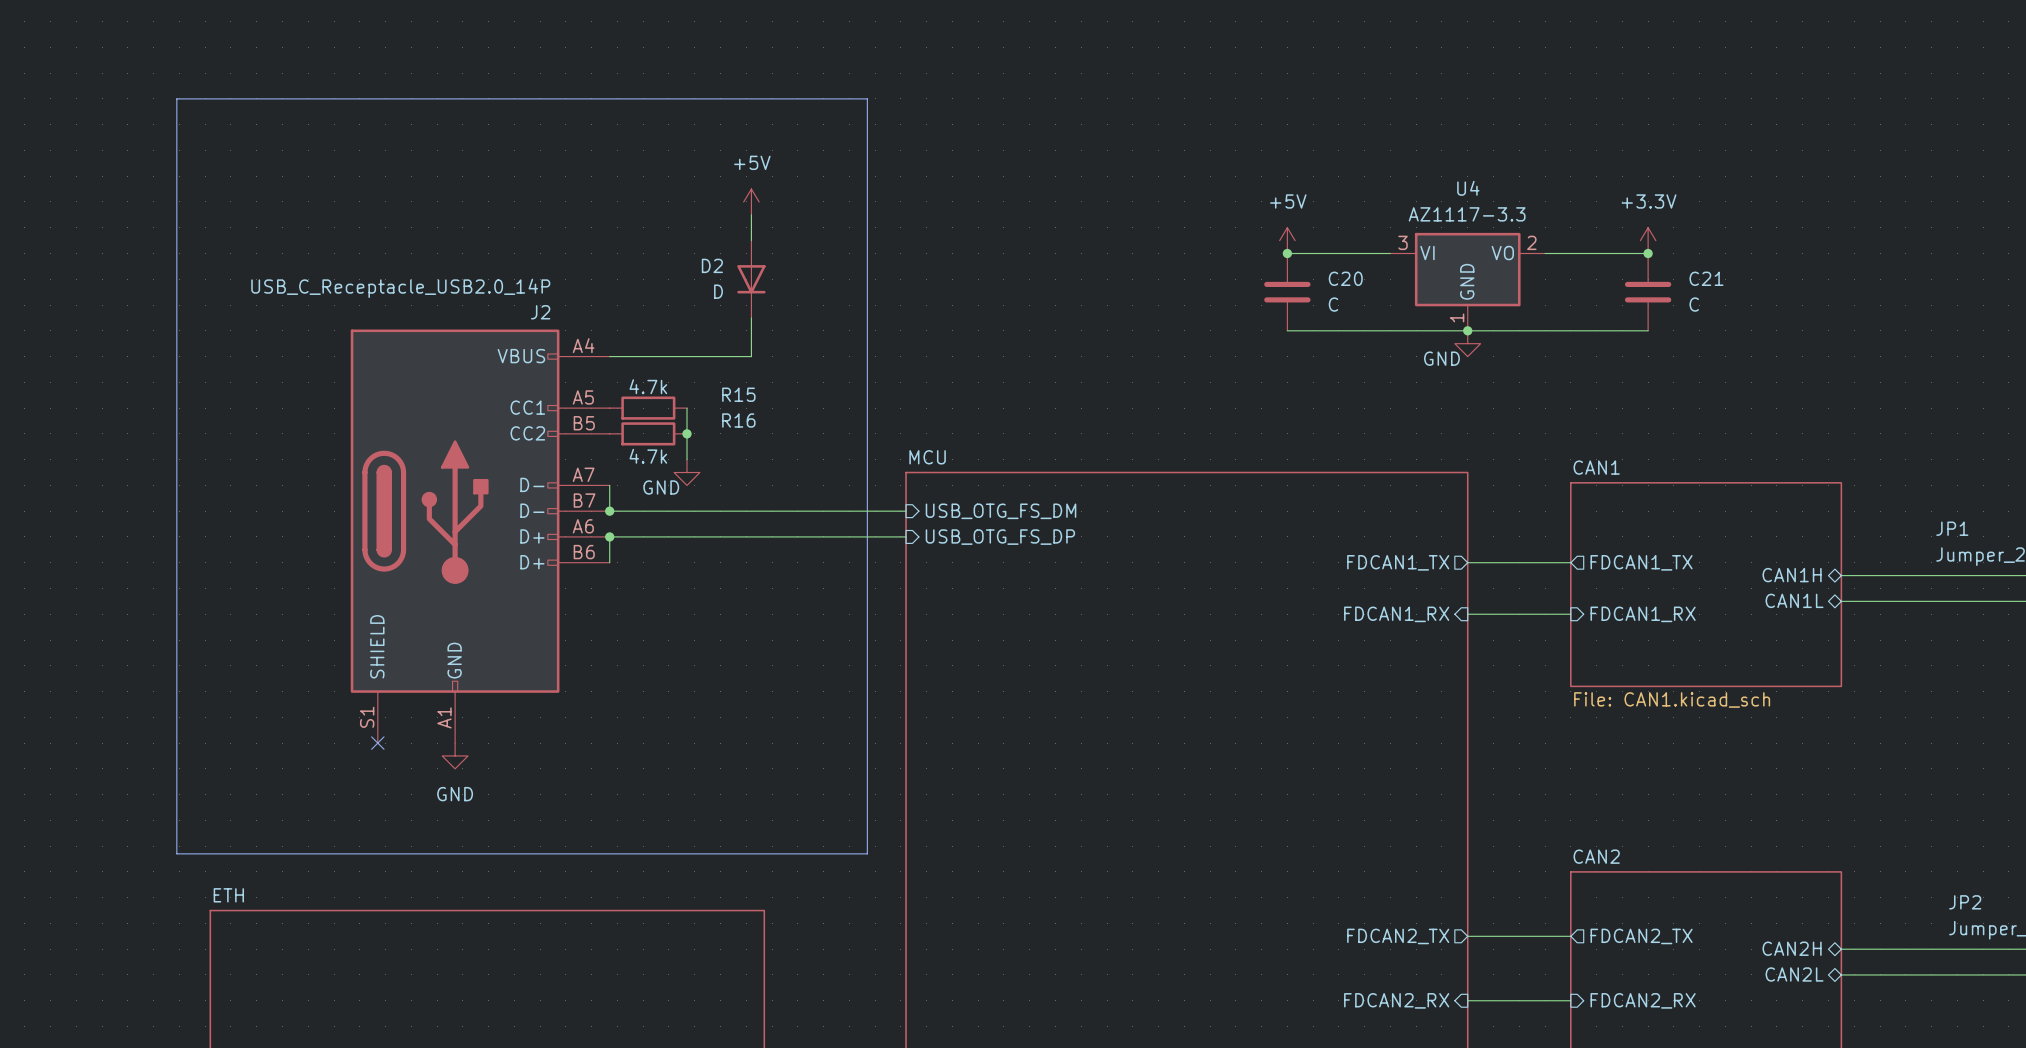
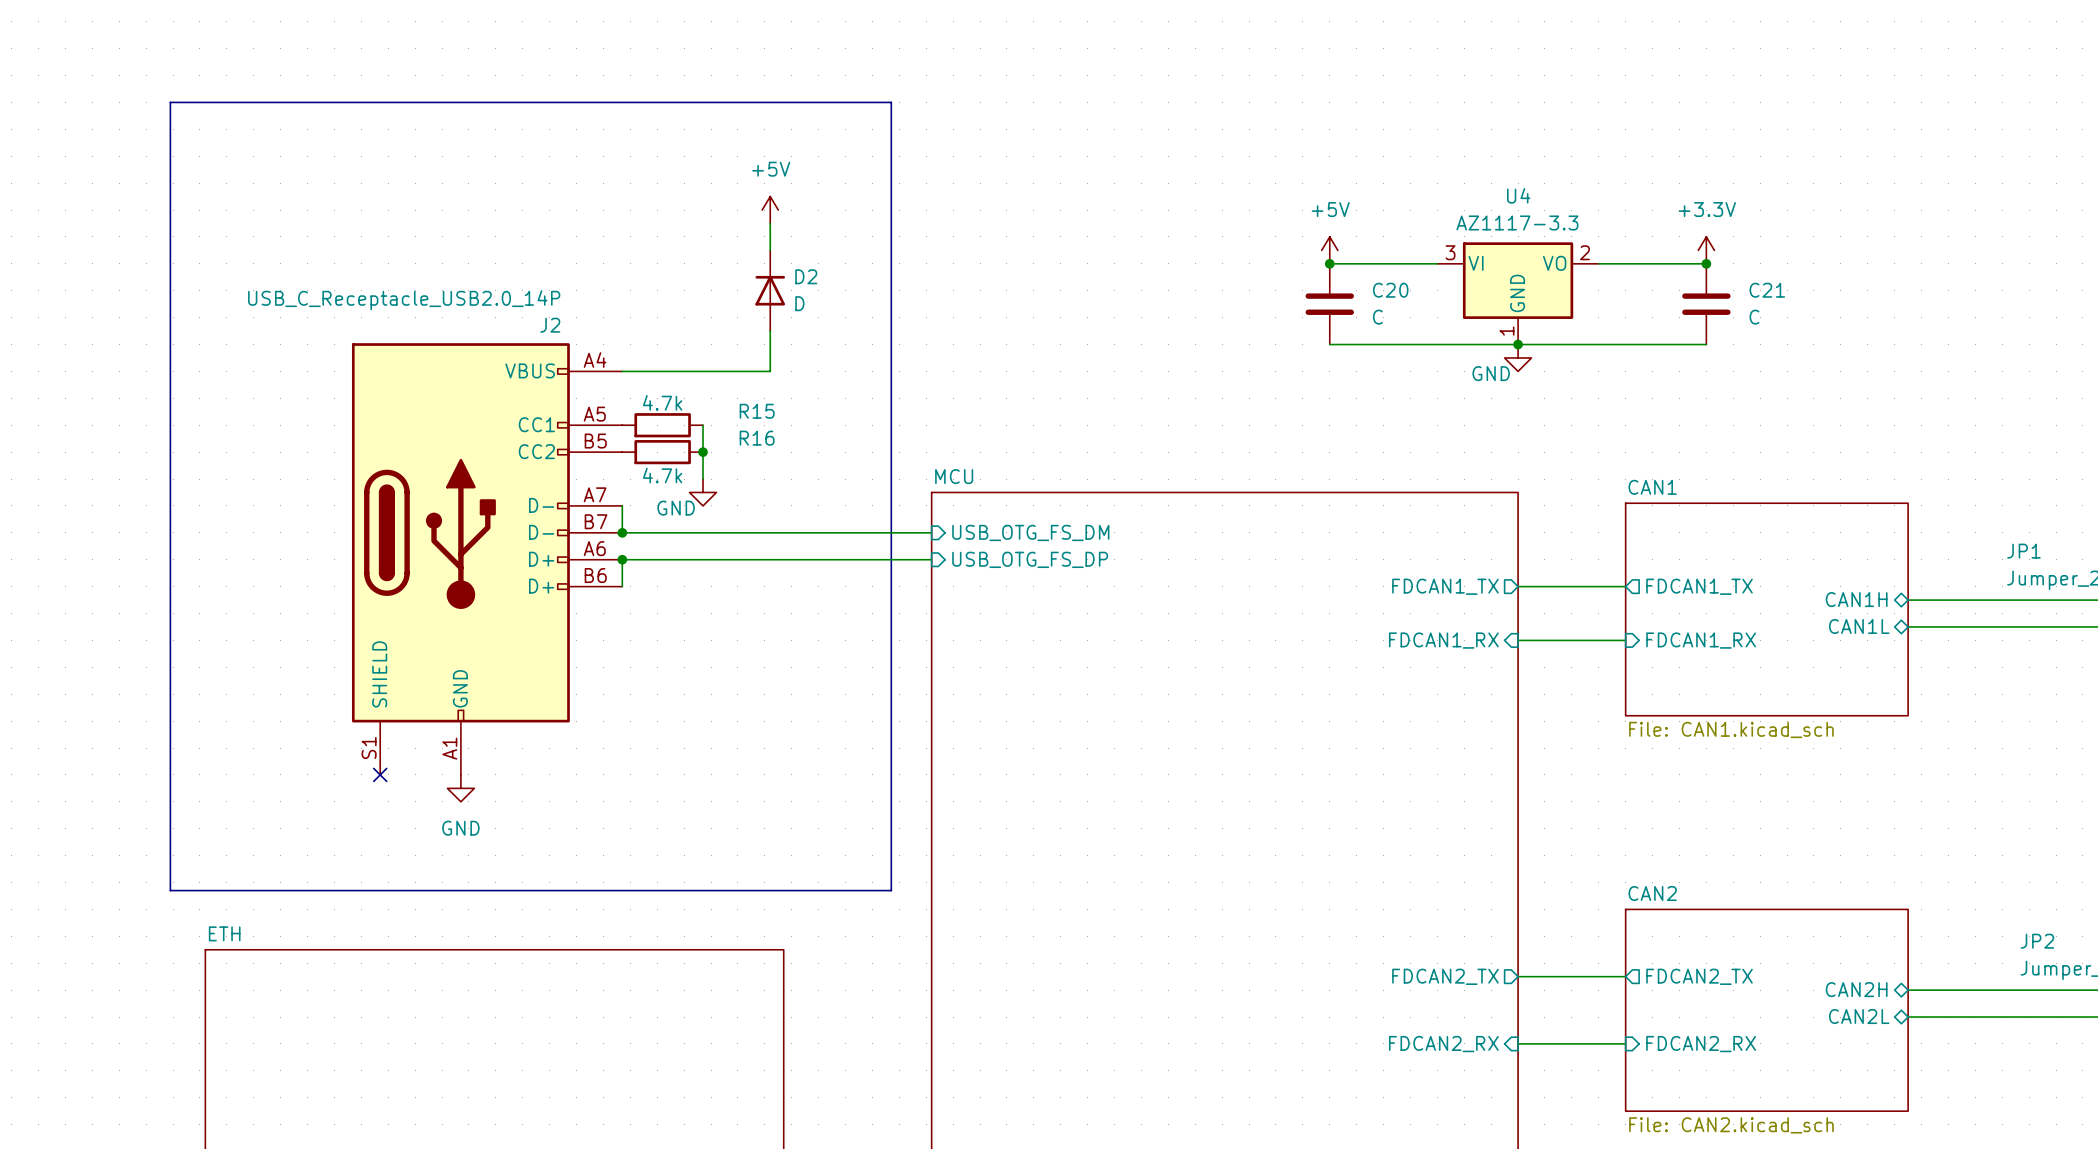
D2 name position: D2 (712, 265) -> D2 (806, 276)
D2 rotation: 0° (751, 279) -> 180° (770, 290)
D2 value position: D (718, 291) -> D (799, 303)

